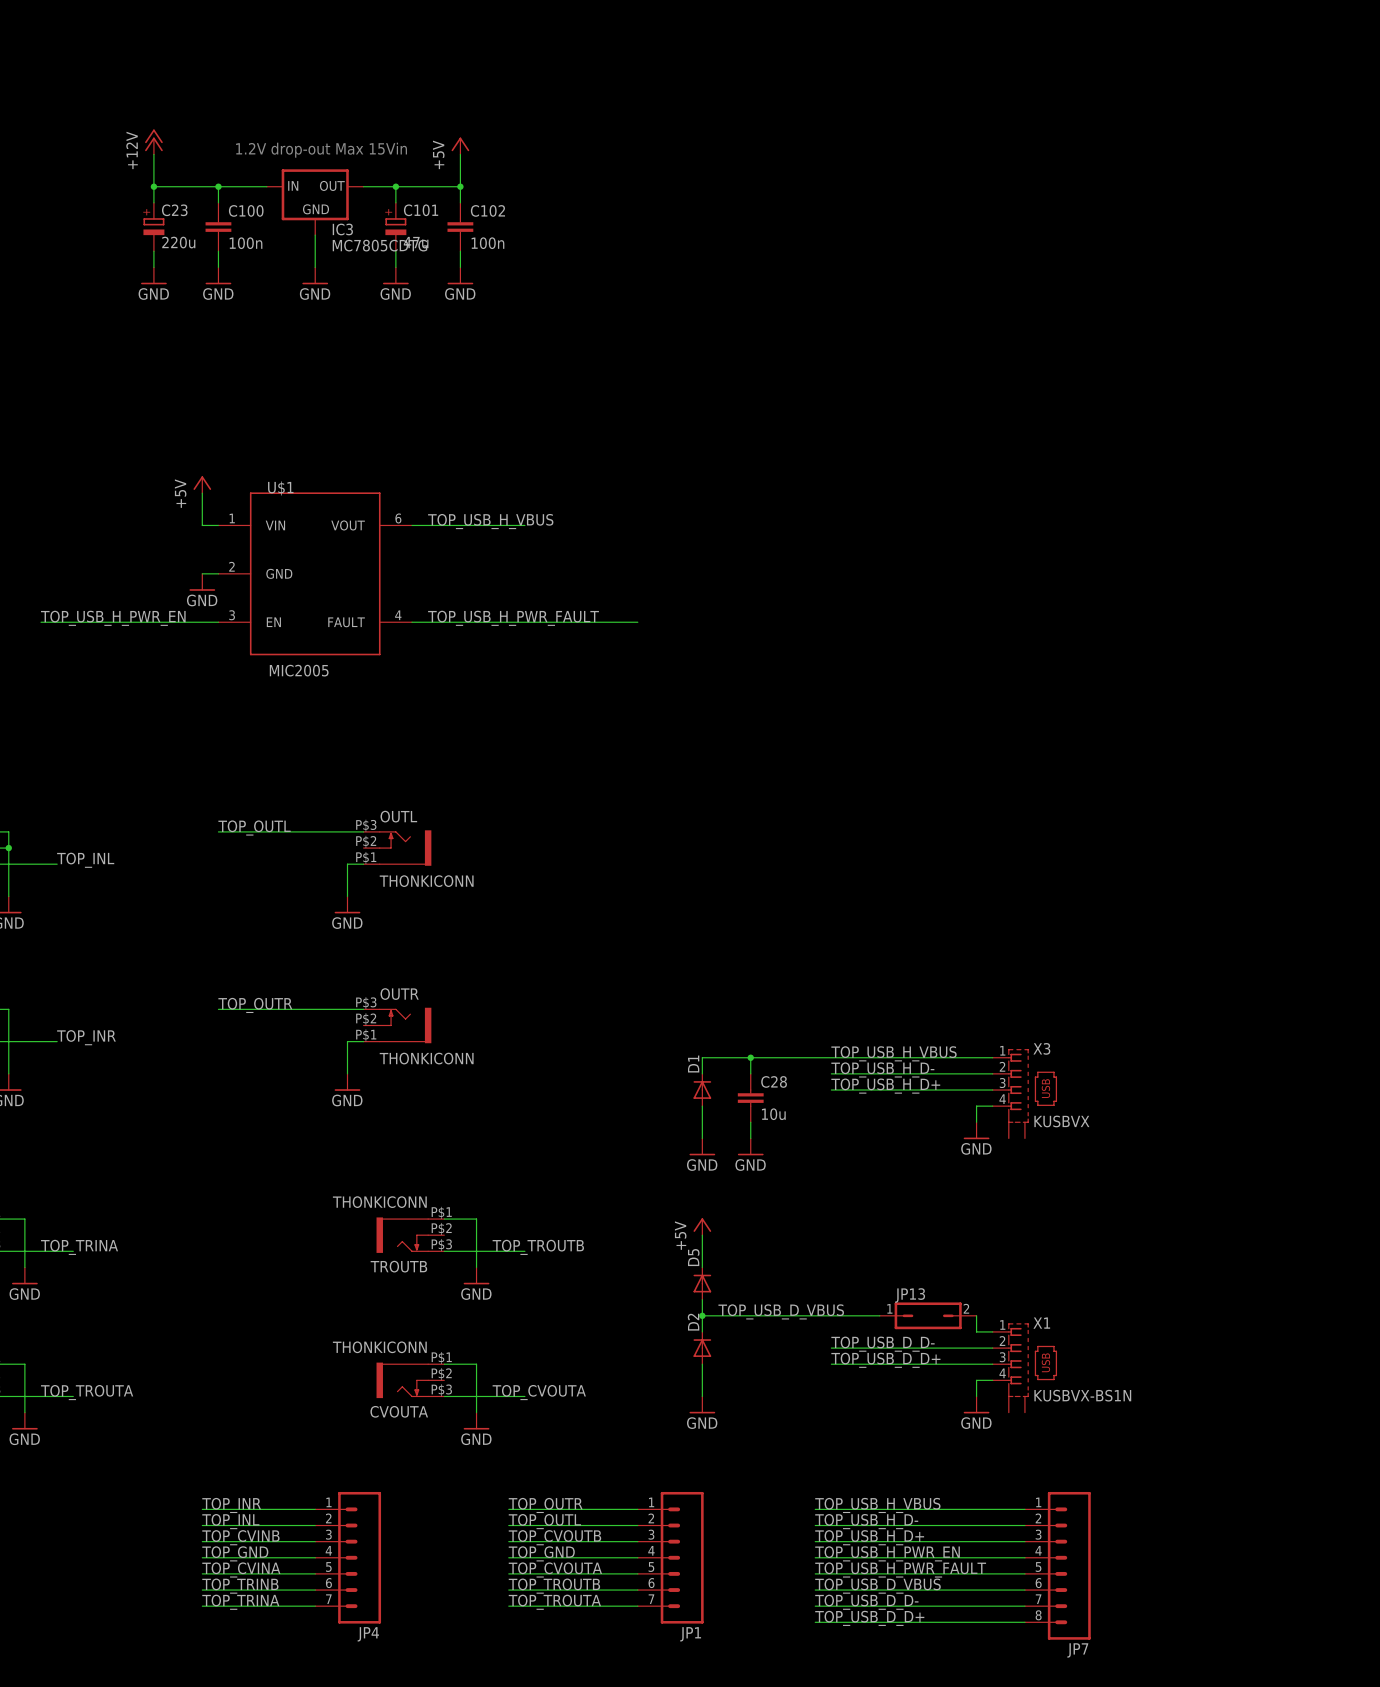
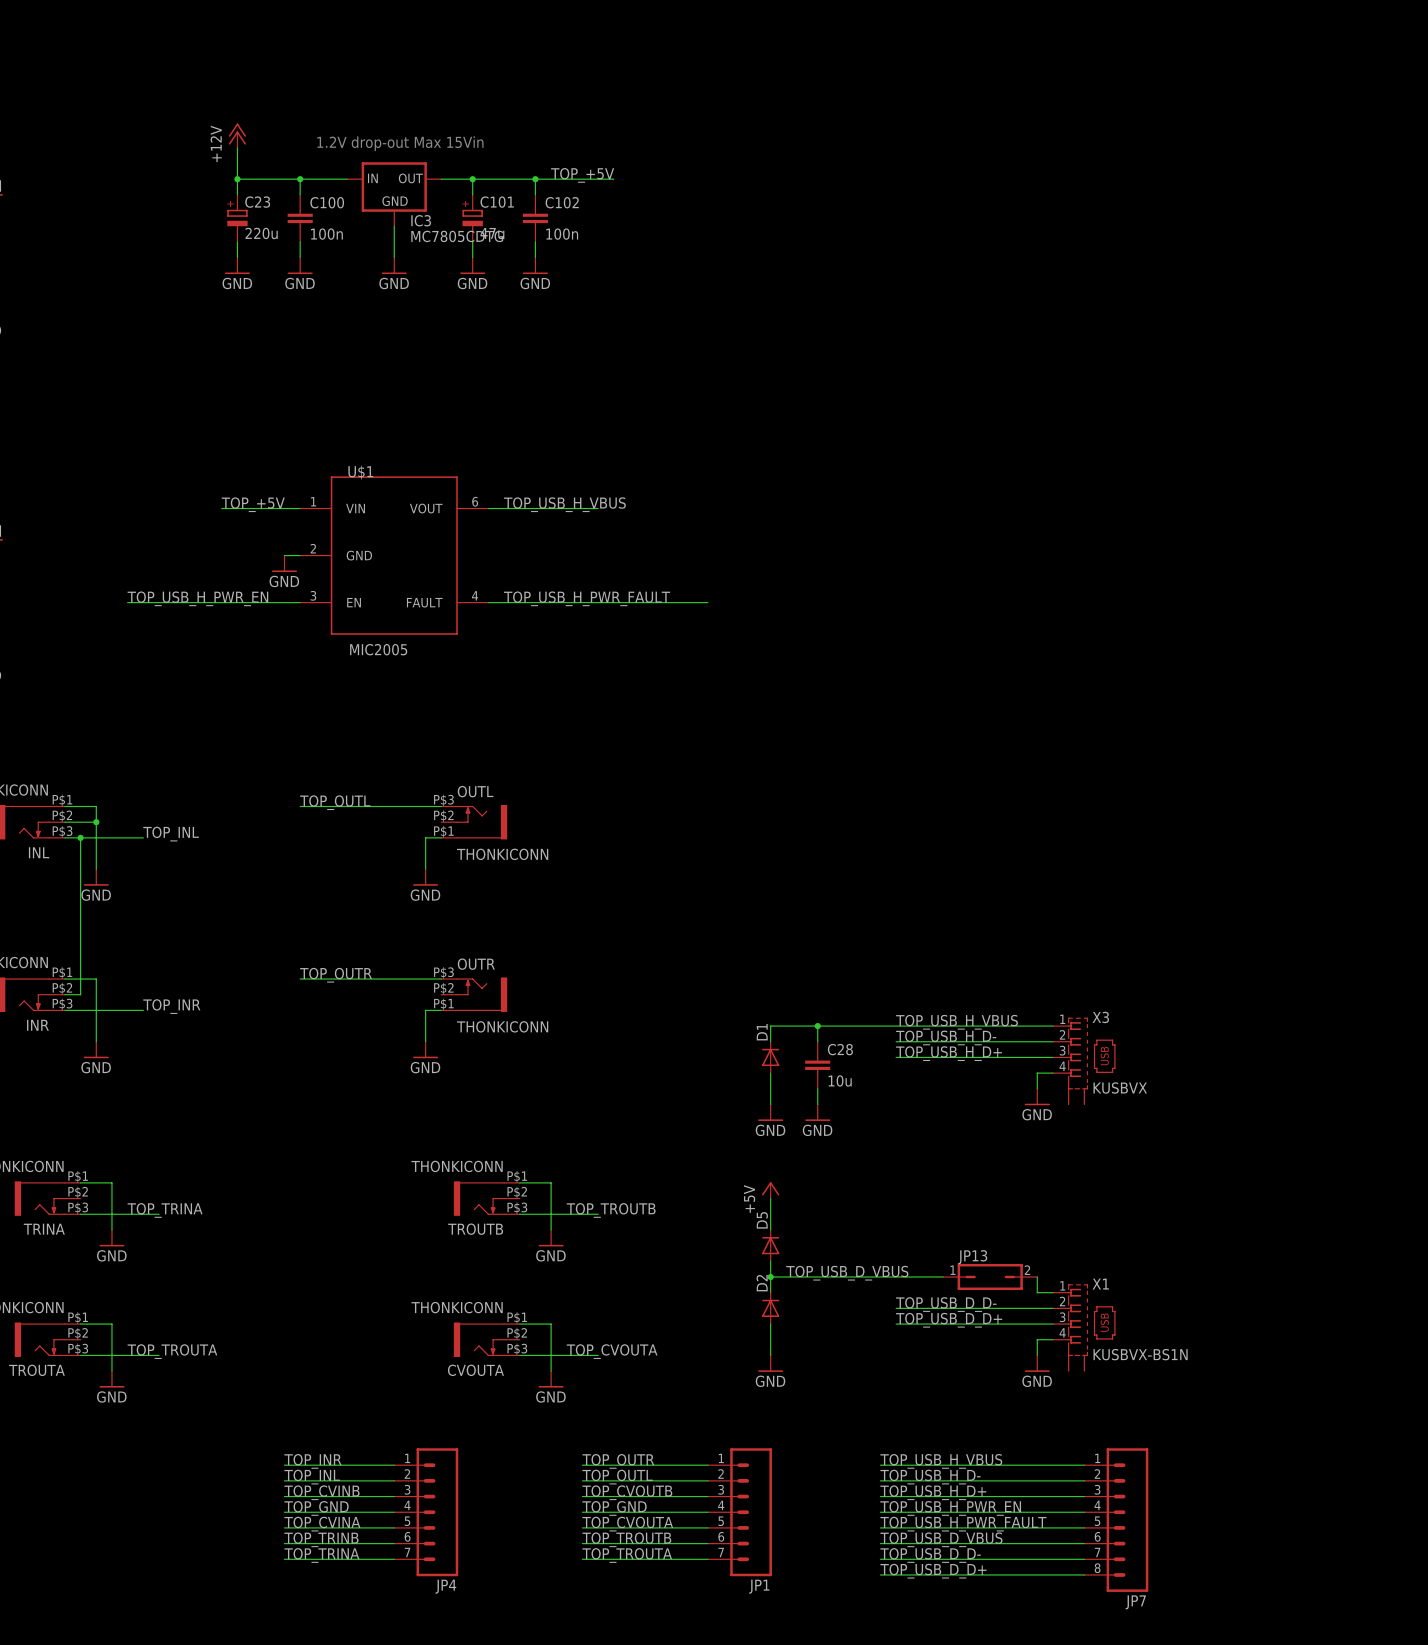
power symbol: +5V (460, 146) -> none
wire: (460, 154) (460, 186) -> (613, 179) (535, 179)
label: none -> TOP_+5V (582, 175)
power symbol: +5V (202, 484) -> none
wire: (202, 493) (202, 525) -> (221, 508) (284, 508)
label: none -> TOP_+5V (253, 504)

